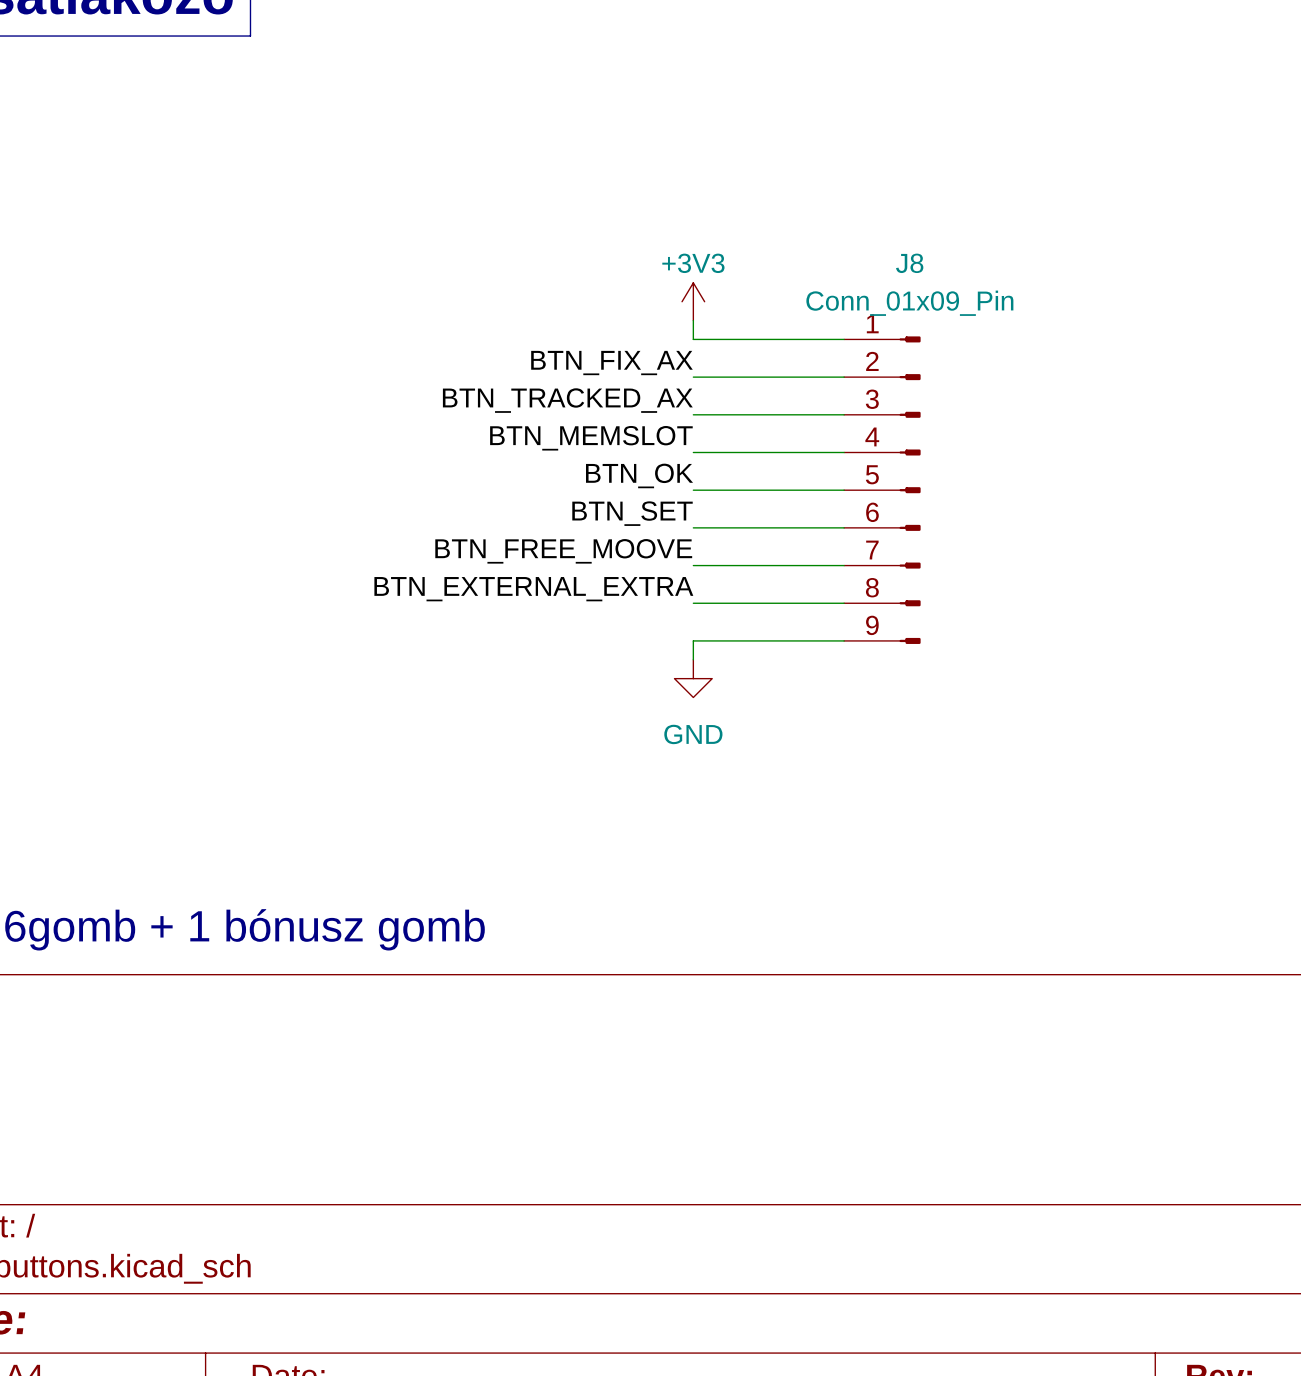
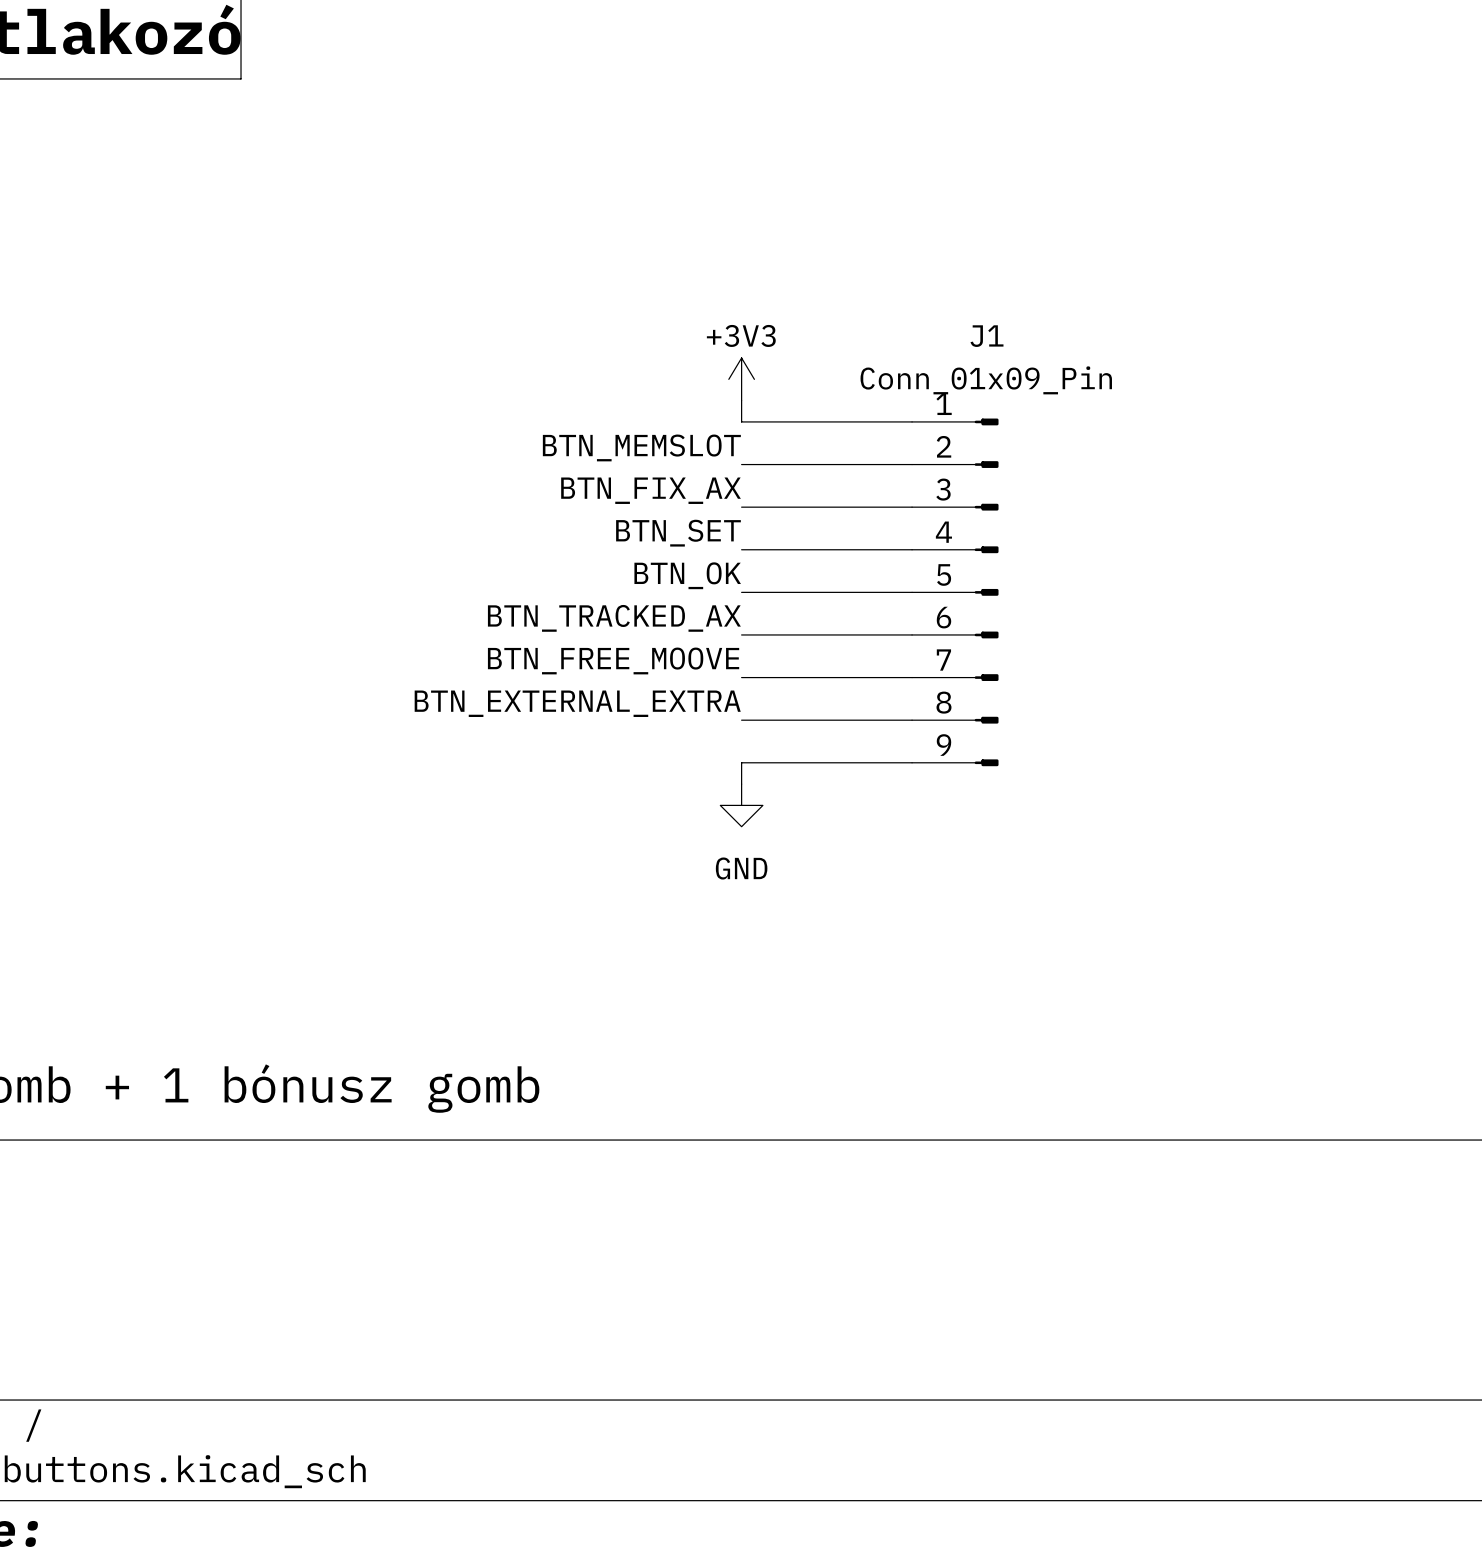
J8 name: J8 (909, 263) -> J1 (987, 336)
label: BTN_FIX_AX (611, 363) -> BTN_MEMSLOT (641, 447)
label: BTN_TRACKED_AX (567, 400) -> BTN_FIX_AX (651, 490)
label: BTN_MEMSLOT (591, 438) -> BTN_SET (678, 533)
label: BTN_SET (632, 513) -> BTN_TRACKED_AX (614, 618)

